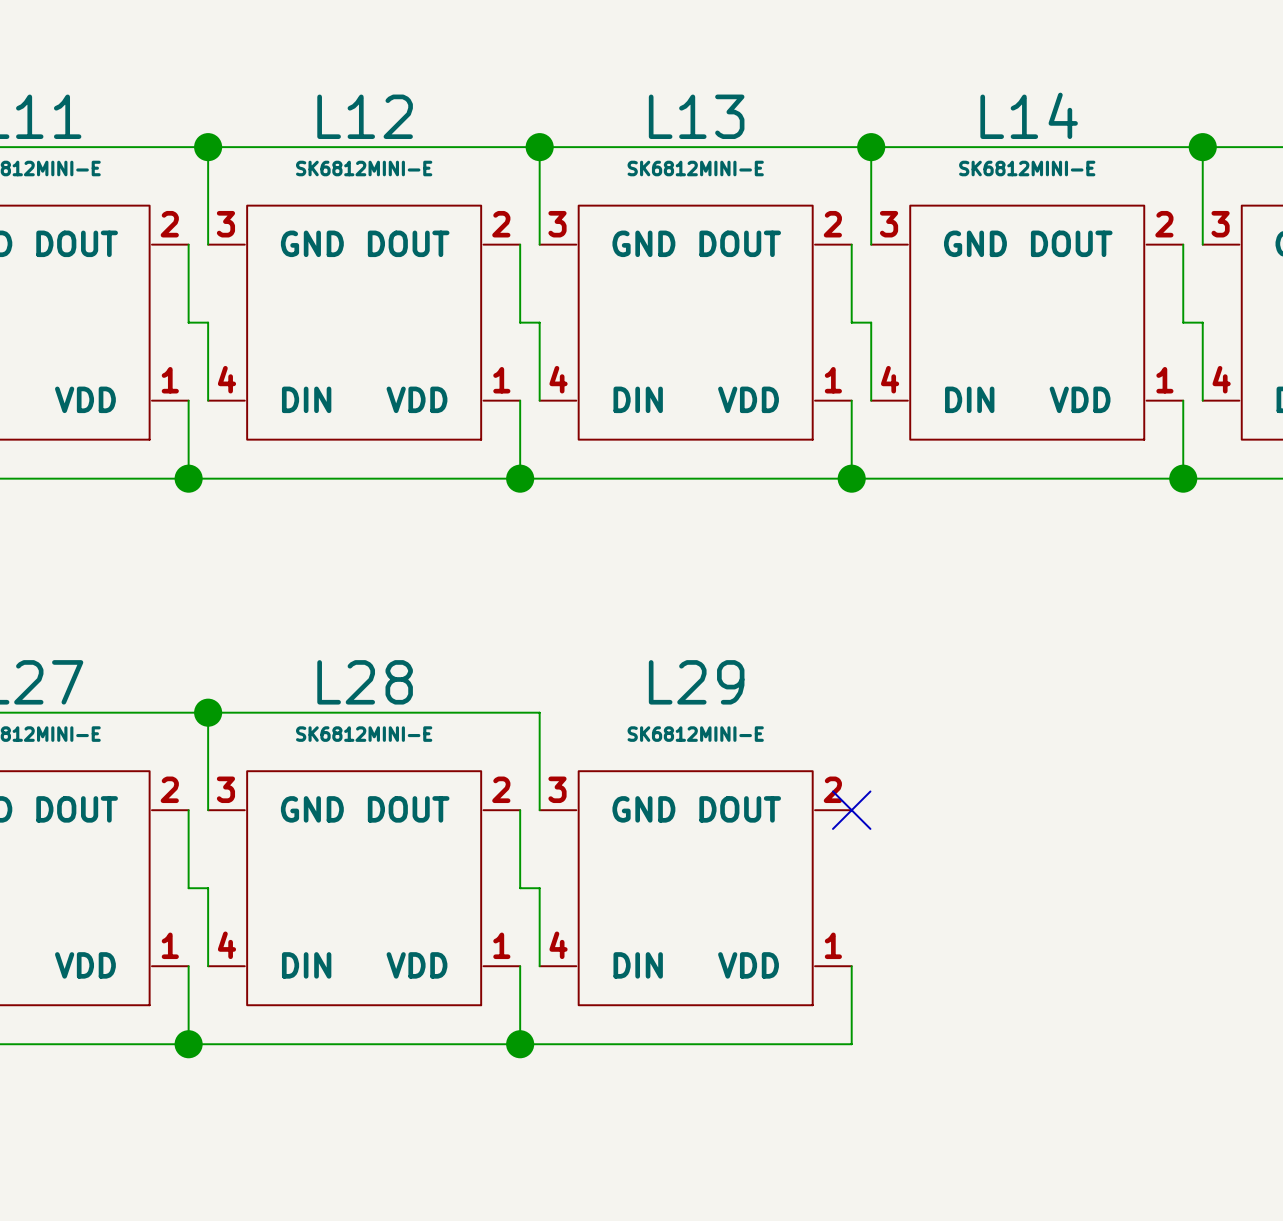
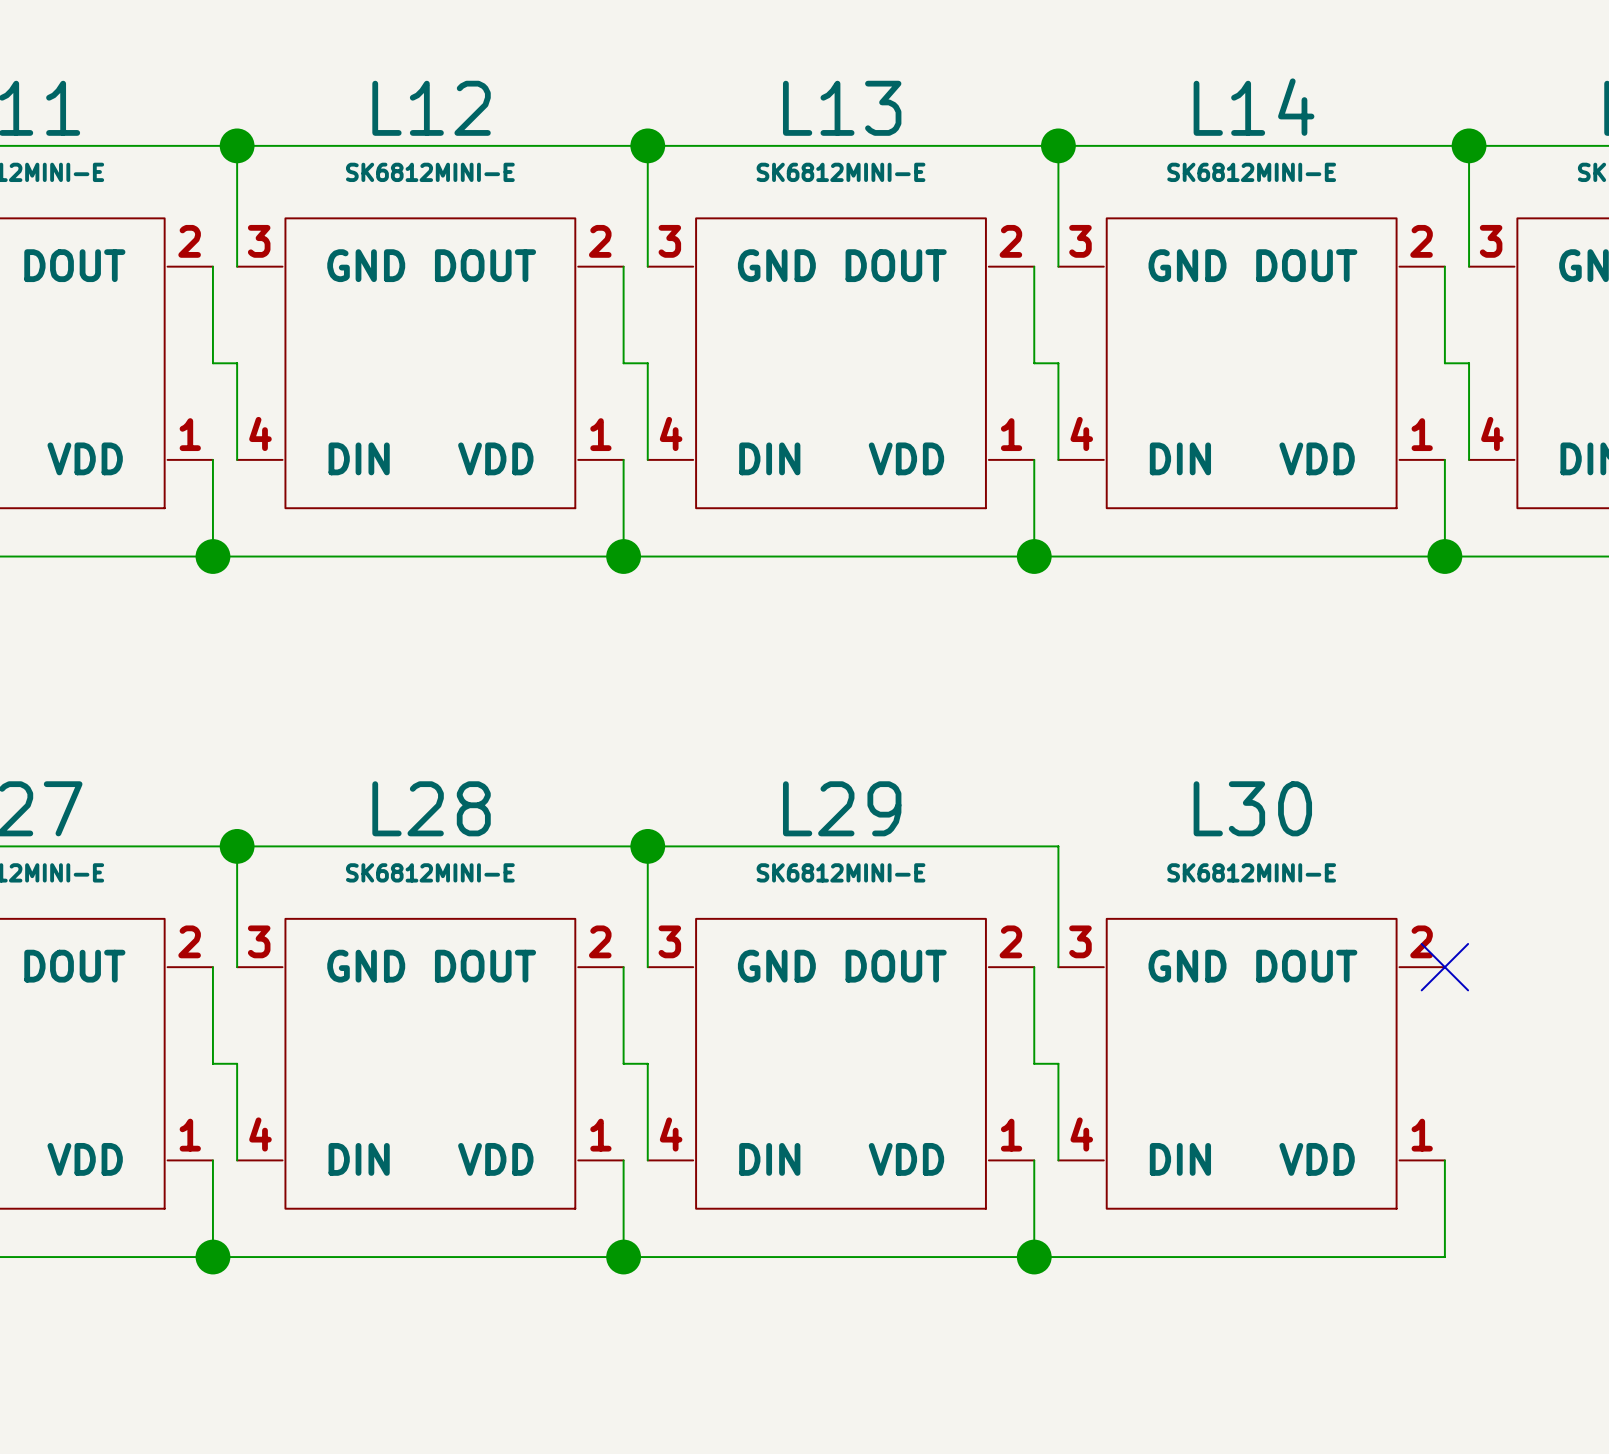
wire: none -> (647, 846) (1058, 846) (1058, 967)
junction: none -> (647, 846)
wire: none -> (1034, 967) (1034, 1063) (1058, 1063) (1058, 1160)
no-connect mark: (851, 810) -> none
no-connect mark: none -> (1444, 967)
L30: none -> SK6812MINI-E (1251, 1063)
wire: none -> (1444, 1160) (1444, 1257) (1034, 1257)
junction: none -> (1034, 1257)

